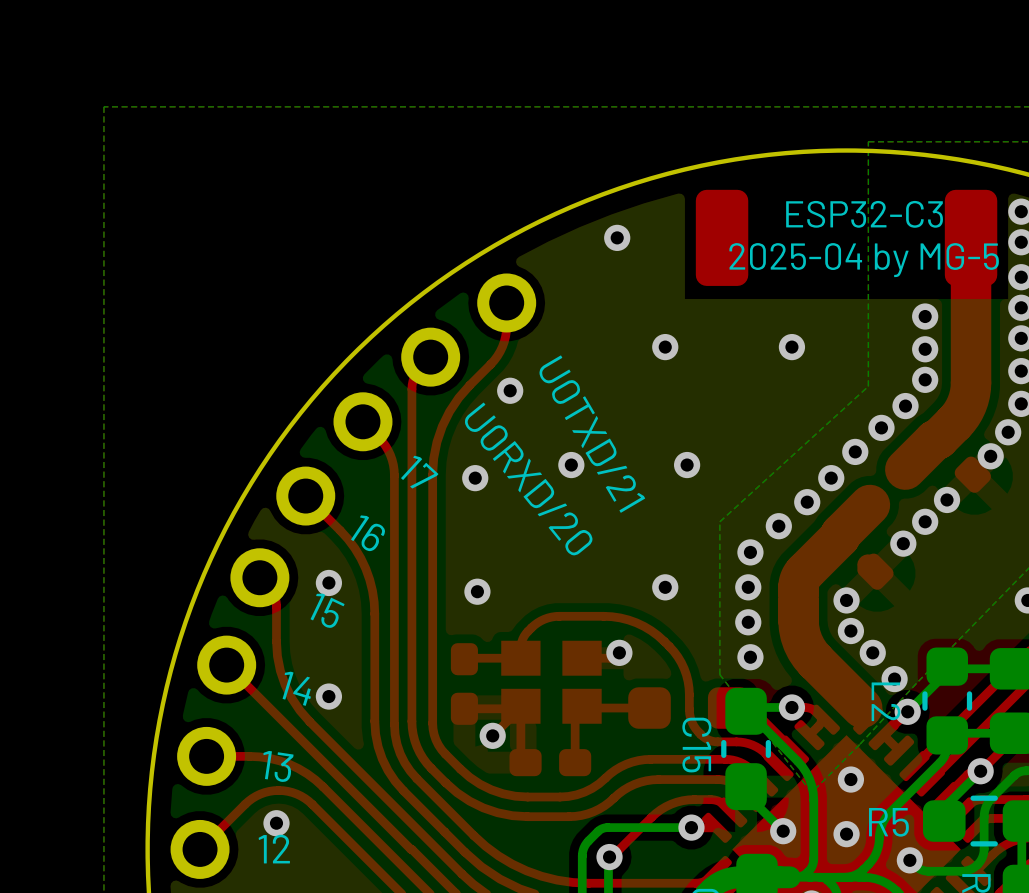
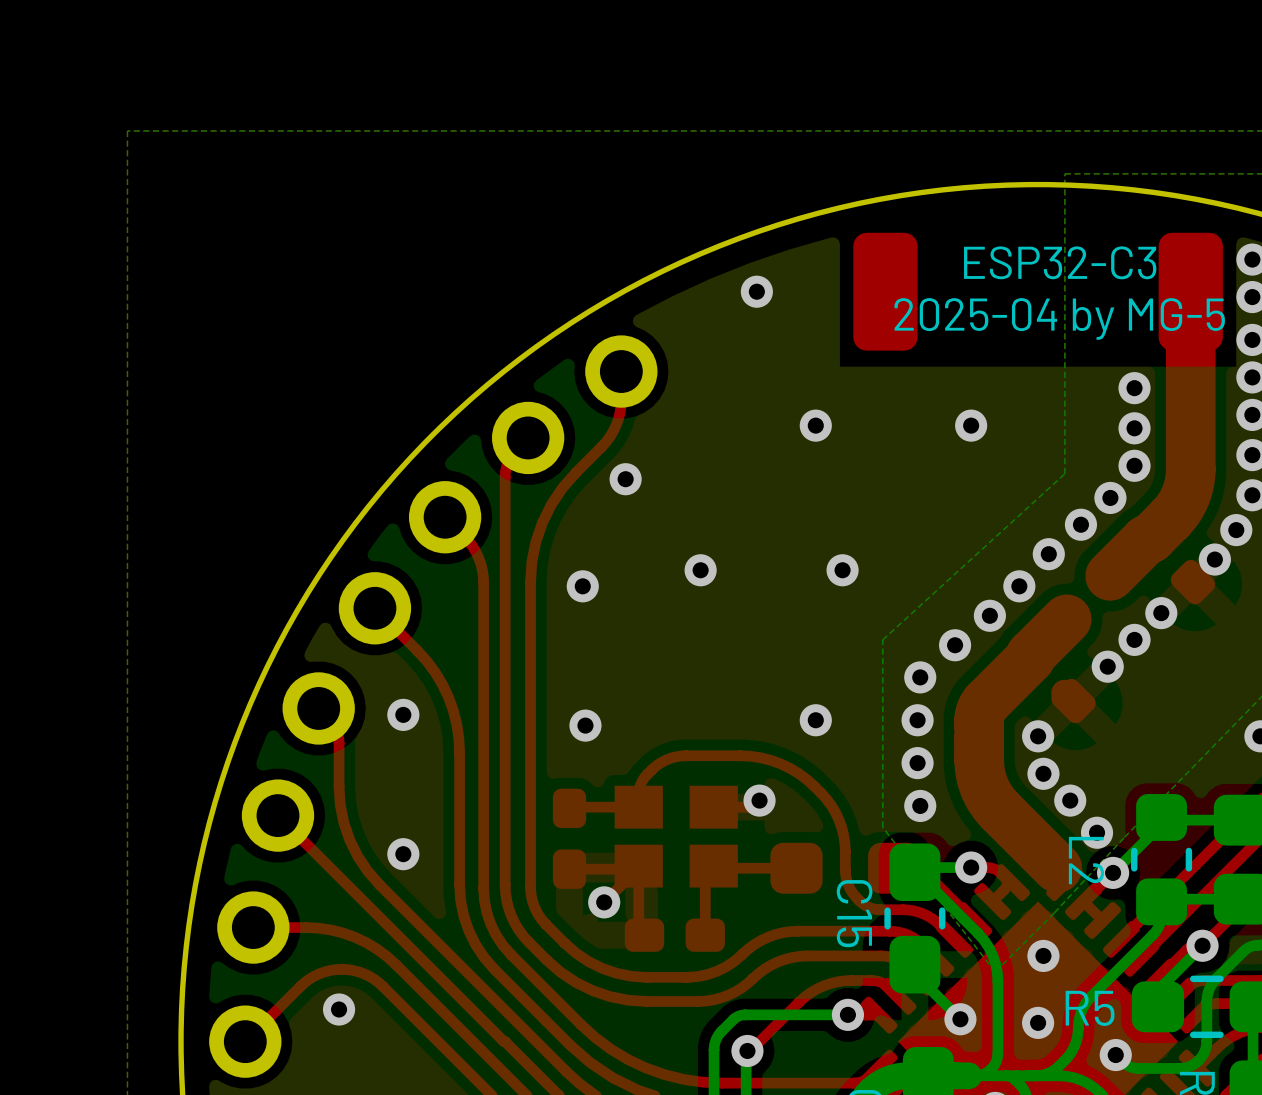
text: U0TXD/21 (592, 434) -> none
text: 17 (419, 472) -> none
text: U0RXD/20 (528, 479) -> none
text: 16 (368, 533) -> none
text: 15 (327, 610) -> none
text: 14 (296, 688) -> none
text: 13 (278, 766) -> none
text: 12 (274, 849) -> none

